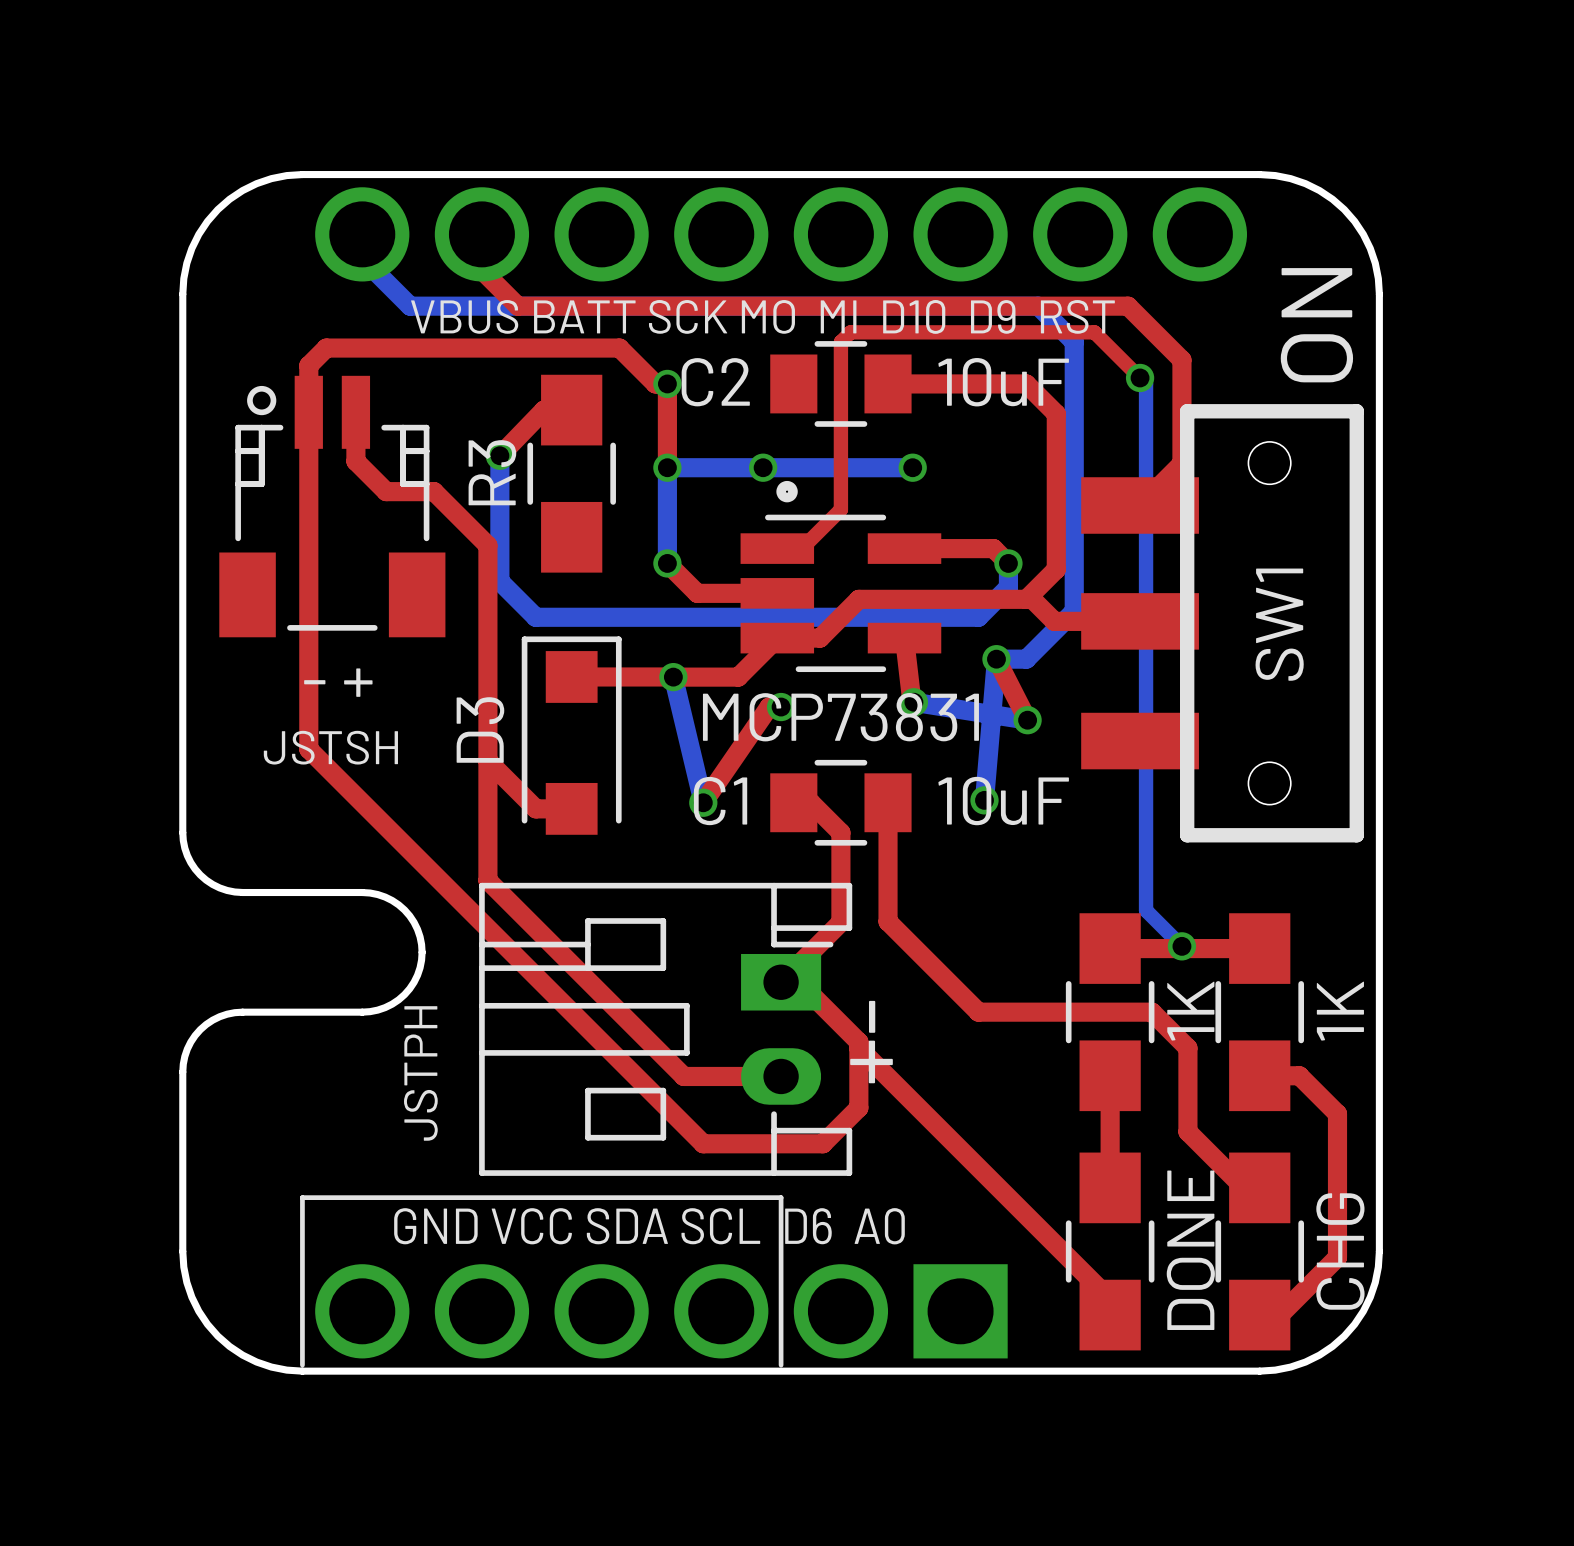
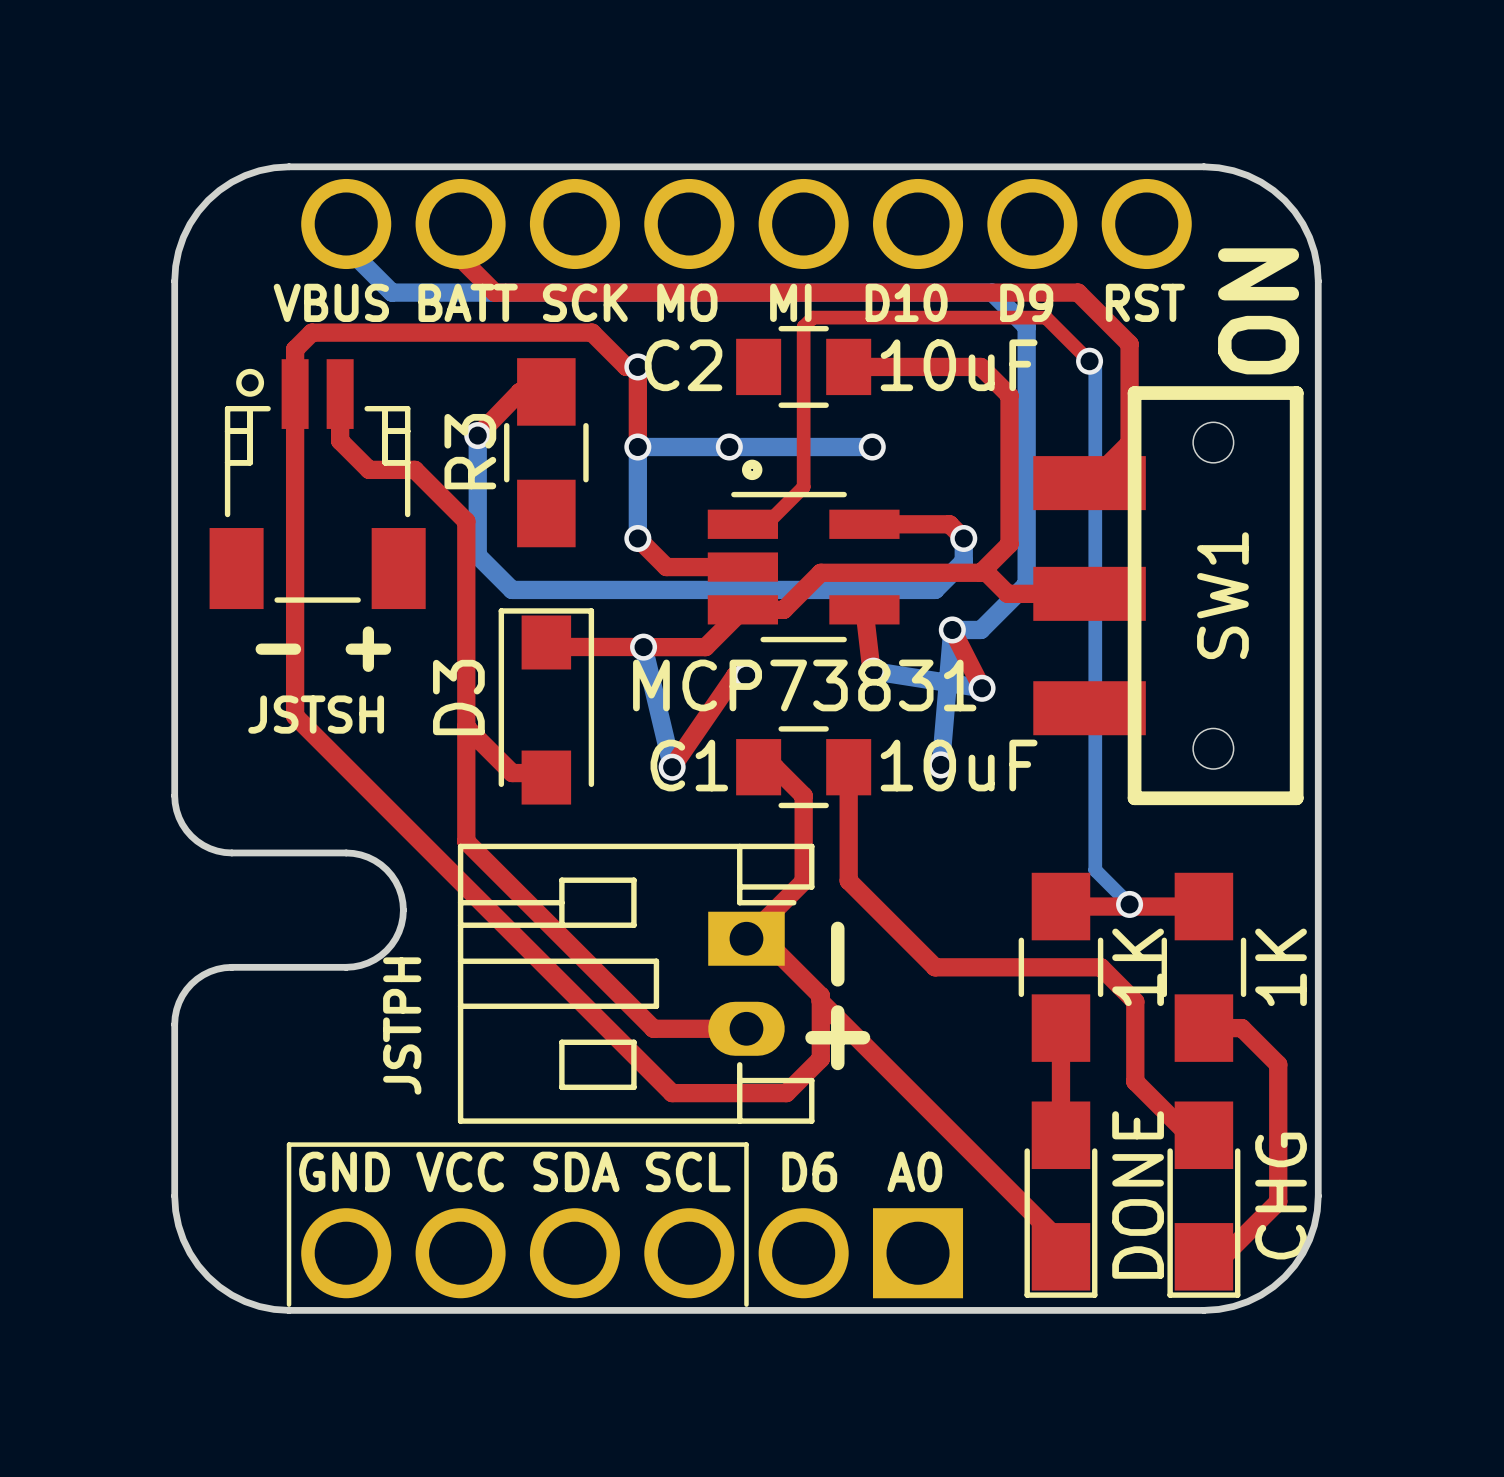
D3 footprint: [521, 636, 622, 835] -> [498, 608, 595, 805]
part footprint: [1065, 1152, 1155, 1351] -> [1024, 1101, 1098, 1298]
part footprint: [1215, 1152, 1305, 1351] -> [1167, 1101, 1241, 1298]

